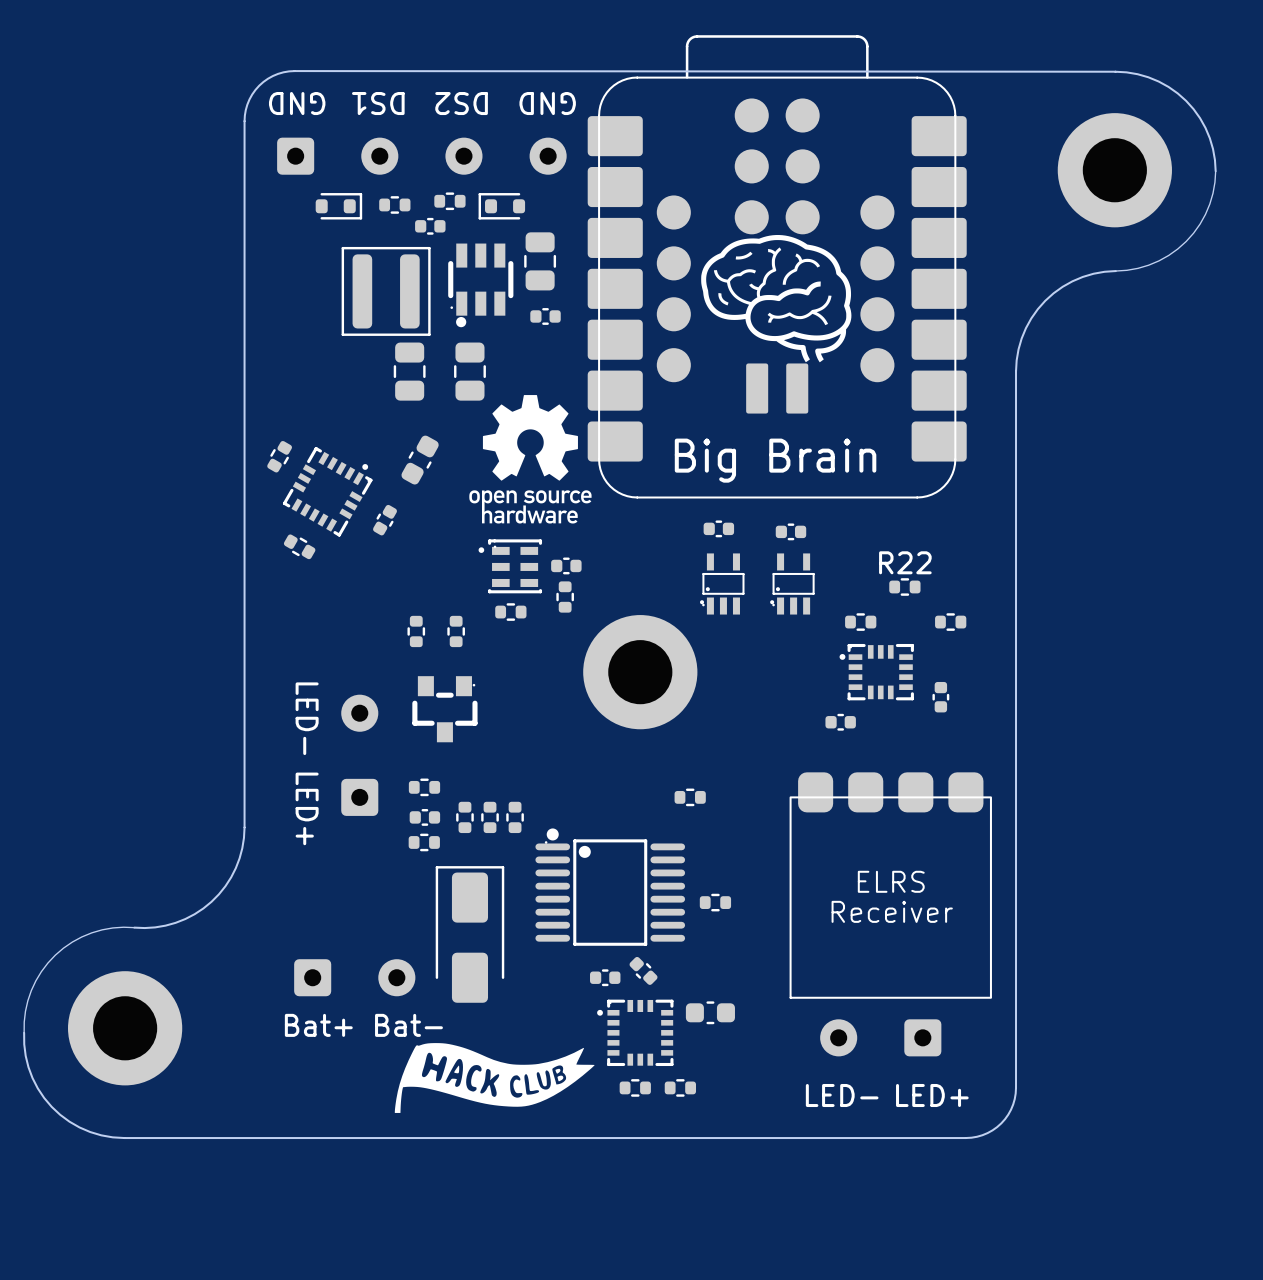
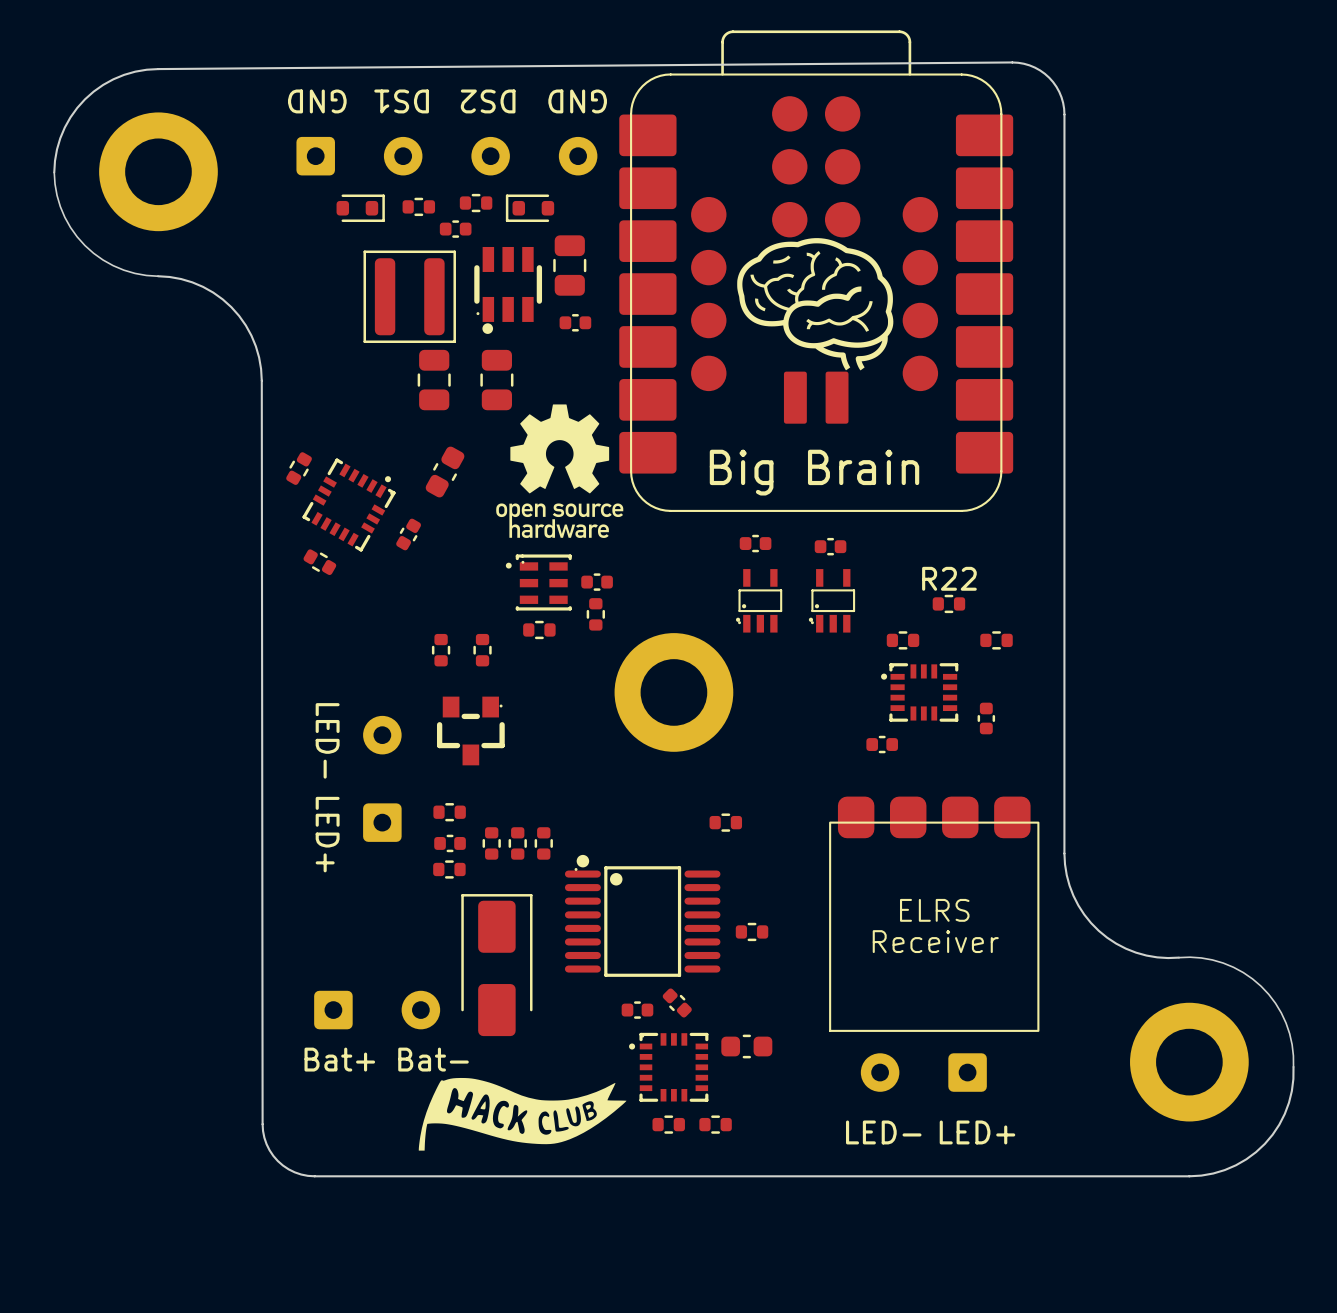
board edge: (294, 71) (1115, 71) (1137, 74) (1158, 81) (1177, 93) (1200, 118) (1209, 138) (1215, 171) (1209, 204) (1193, 233) (1168, 255) (1148, 265) (1126, 270) (1093, 273) (1062, 286) (1037, 309) (1025, 328) (1018, 349) (1016, 371) (1016, 1087) (1013, 1104) (1008, 1114) (992, 1130) (977, 1136) (965, 1138) (124, 1138) (90, 1132) (69, 1121) (51, 1106) (37, 1088) (25, 1055) (24, 1022) (31, 990) (47, 963) (72, 942) (91, 932) (112, 927) (165, 925) (194, 914) (211, 901) (225, 886) (235, 868) (242, 848) (244, 827) (244, 115) (252, 94) (263, 81) (278, 73) (294, 71) -> (1012, 62) (146, 69) (124, 74) (103, 84) (85, 99) (70, 117) (57, 149) (54, 172) (60, 206) (77, 236) (93, 253) (123, 270) (146, 275) (181, 279) (213, 292) (239, 315) (251, 335) (259, 357) (261, 380) (262, 1124) (264, 1137) (269, 1150) (277, 1161) (288, 1169) (301, 1174) (314, 1176) (1189, 1176) (1224, 1170) (1246, 1159) (1264, 1143) (1279, 1124) (1291, 1090) (1293, 1055) (1286, 1023) (1268, 994) (1243, 972) (1223, 963) (1201, 957) (1168, 958) (1146, 955) (1116, 943) (1098, 930) (1084, 914) (1073, 895) (1066, 875) (1064, 853) (1064, 108) (1059, 91) (1049, 77) (1034, 67) (1012, 62)
part: (1114, 170) -> none
part: none -> (158, 171)
part: none -> (1189, 1062)
part: (125, 1028) -> none

